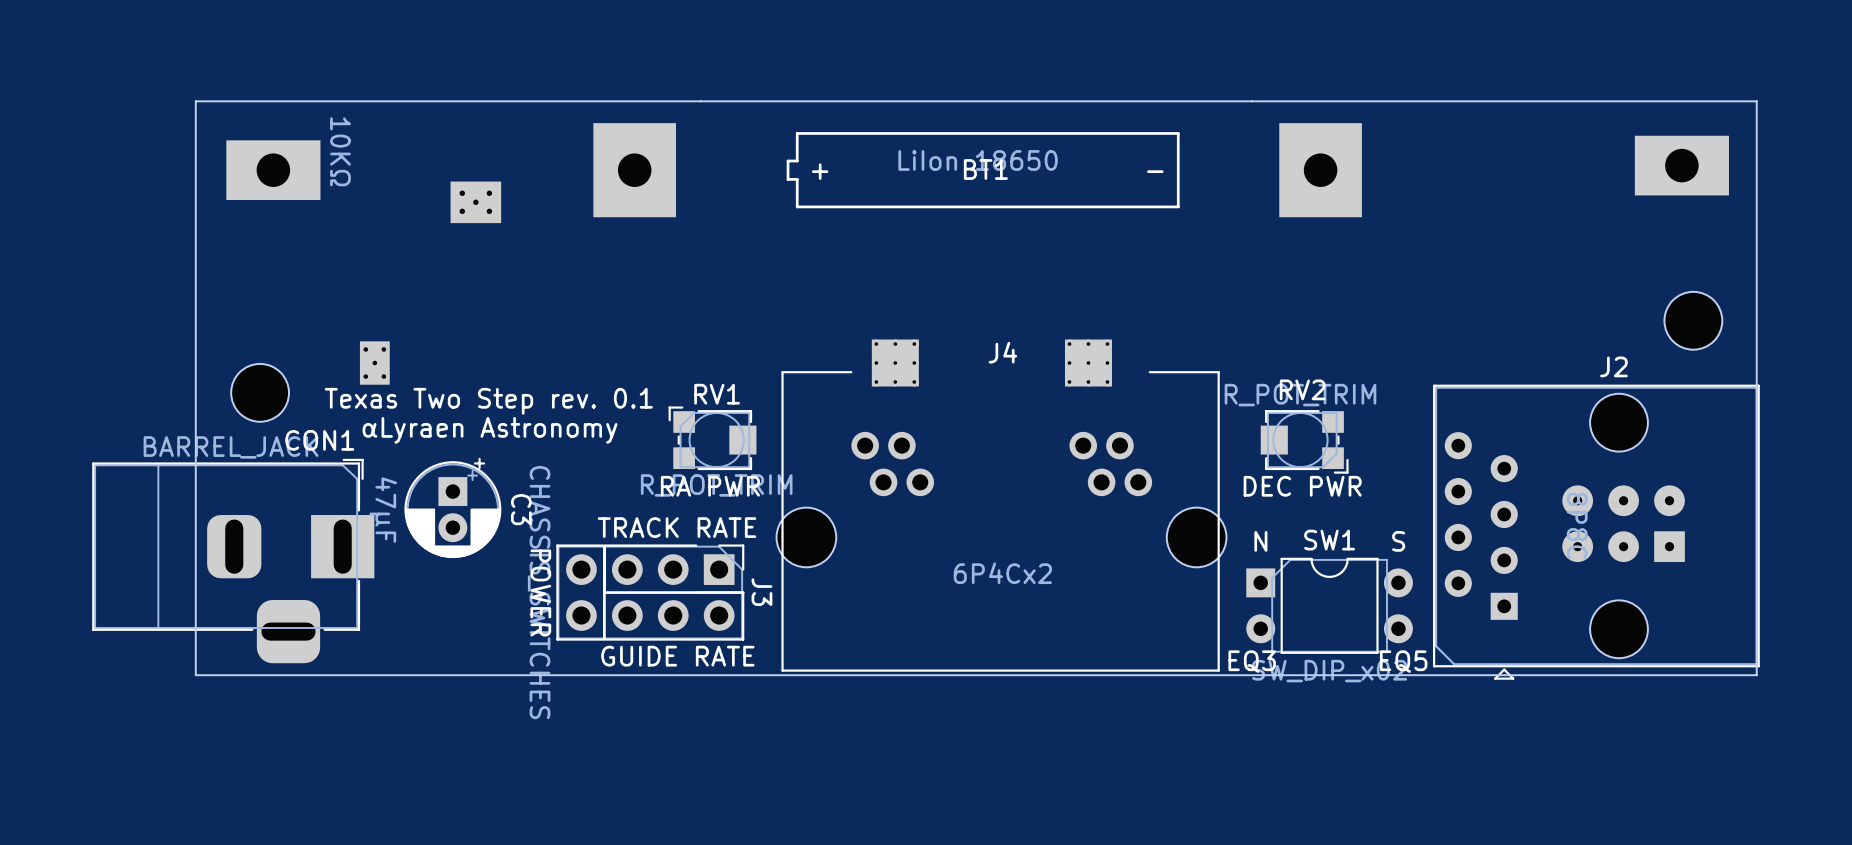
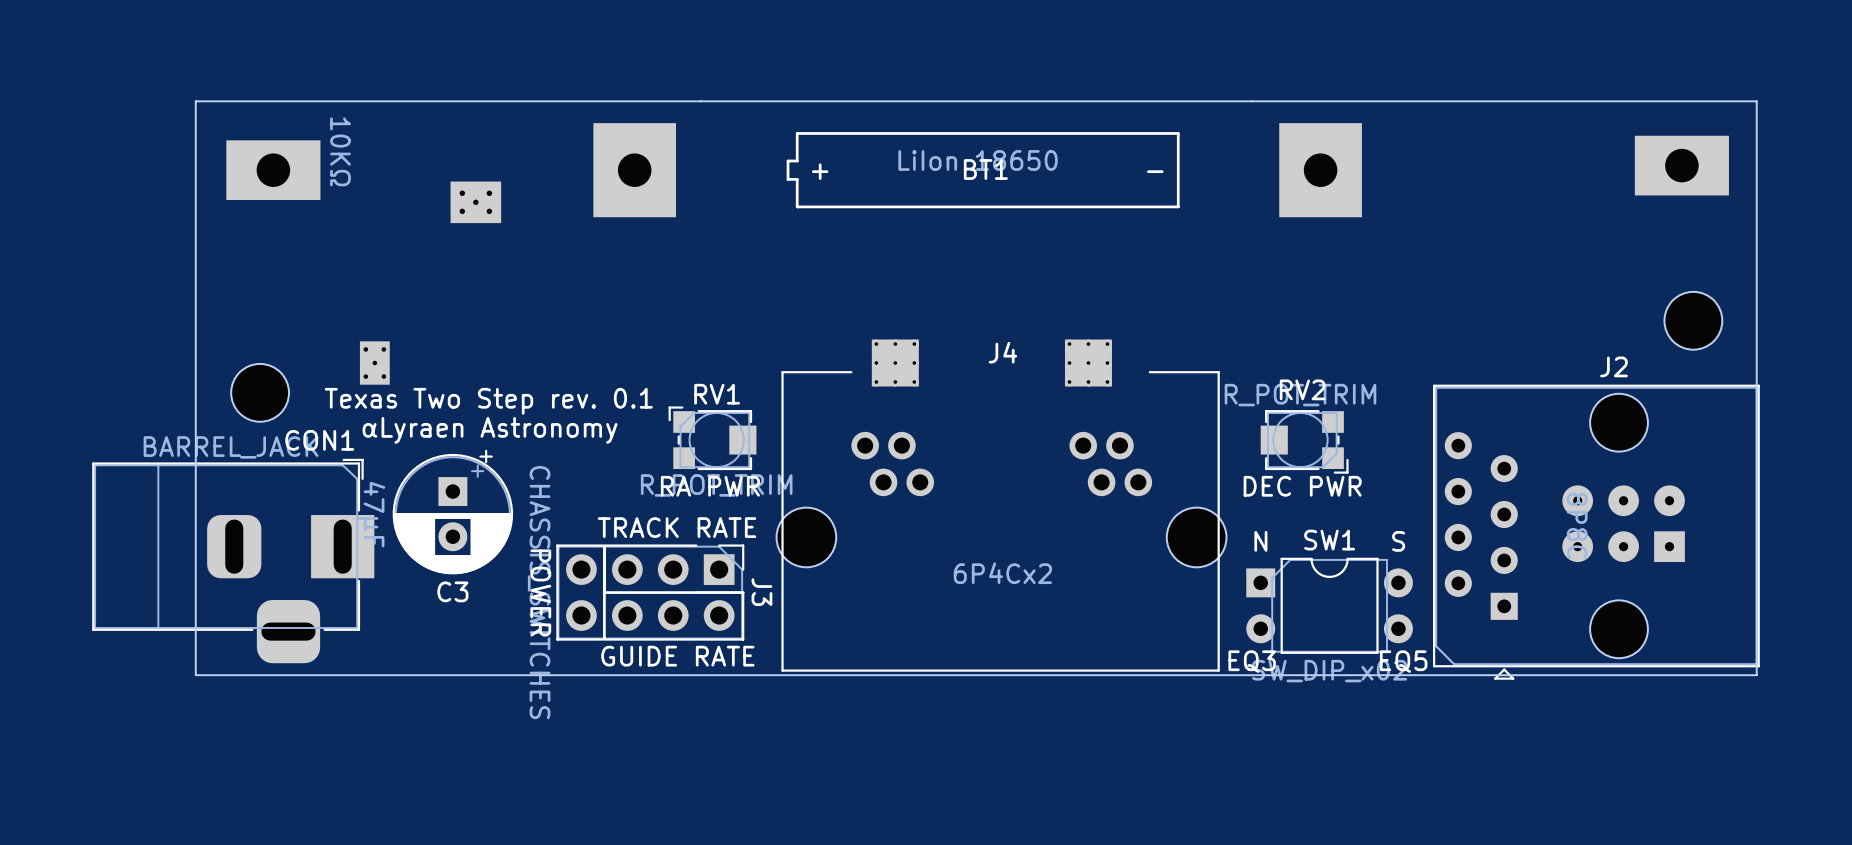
C3 footprint: [404, 457, 502, 559] -> [392, 449, 514, 575]
C3 name position: C3 (521, 509) -> C3 (452, 591)

